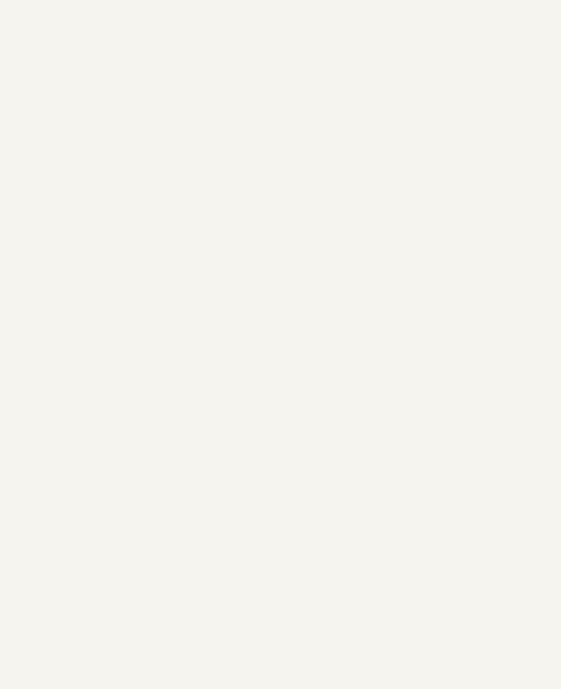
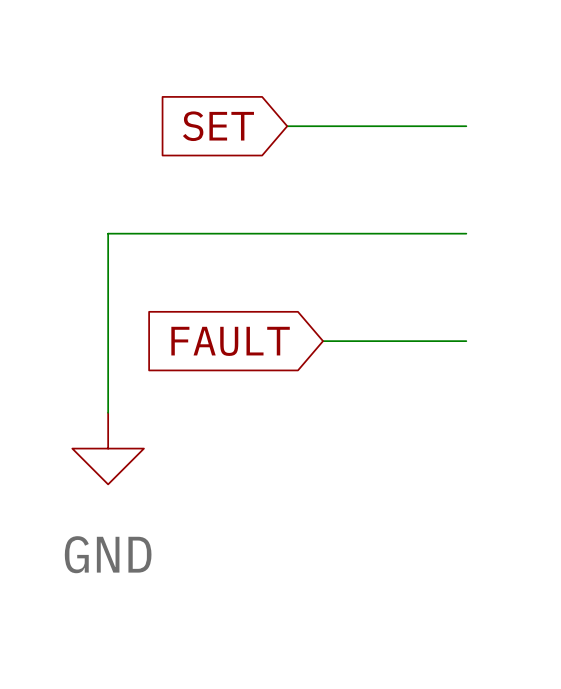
global label: none -> SET (218, 126)
wire: none -> (287, 126) (466, 126)
wire: none -> (466, 233) (108, 233) (108, 412)
global label: none -> FAULT (230, 341)
wire: none -> (323, 341) (466, 341)
power symbol: none -> GND (108, 448)

